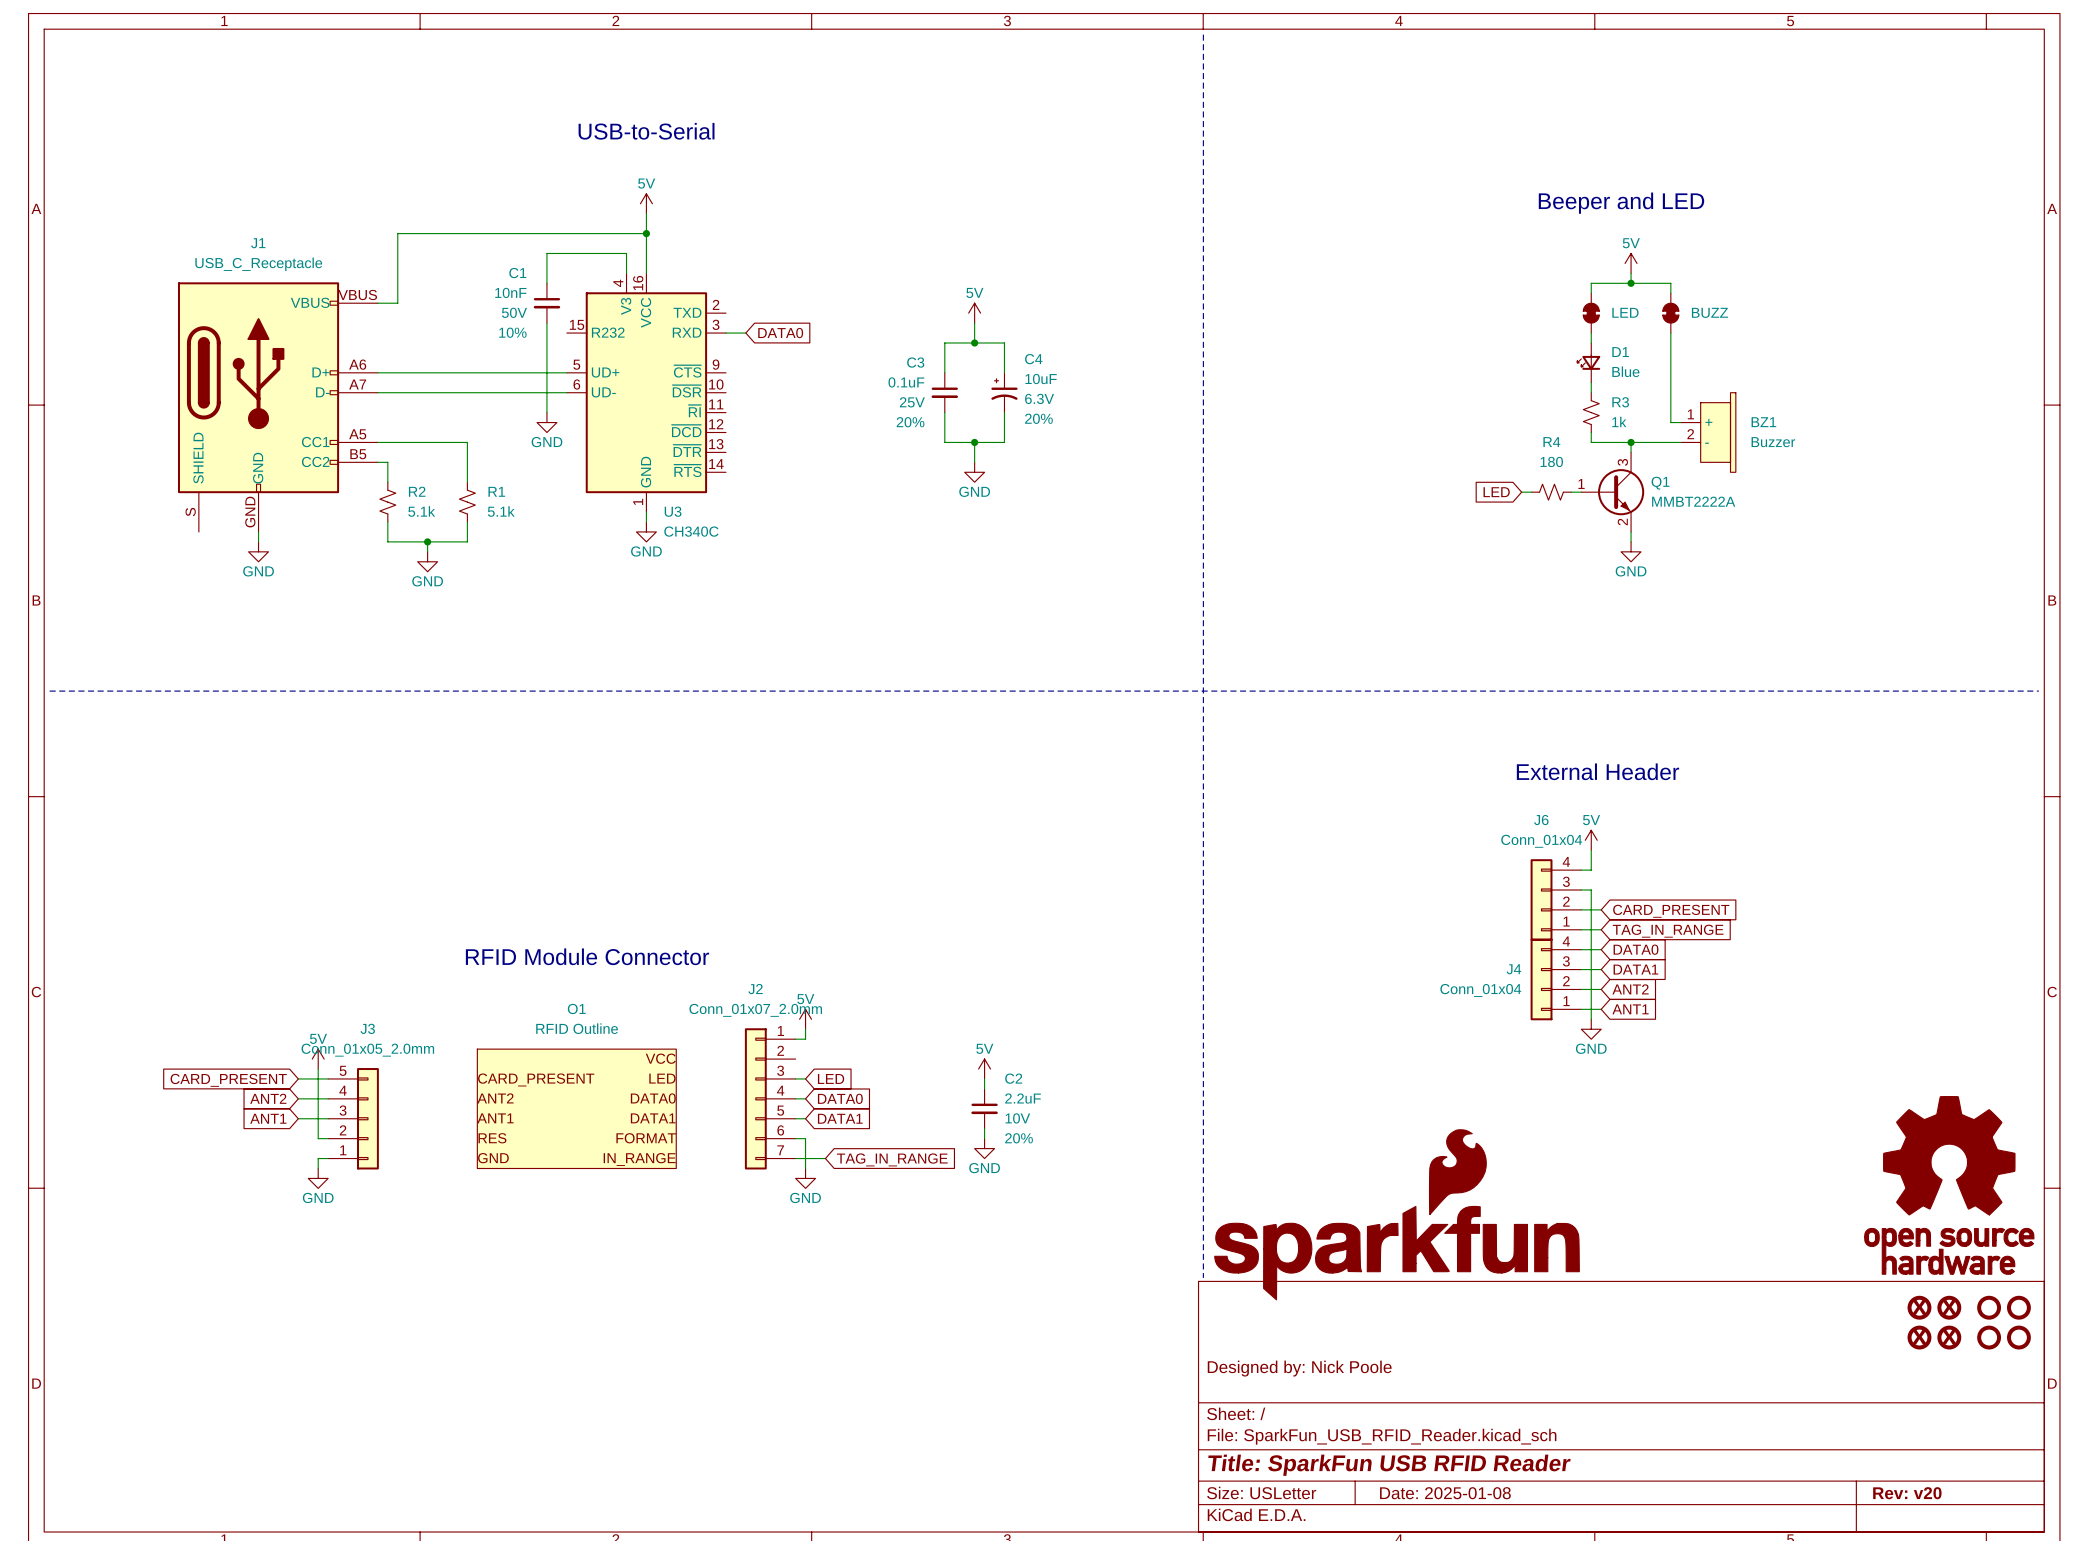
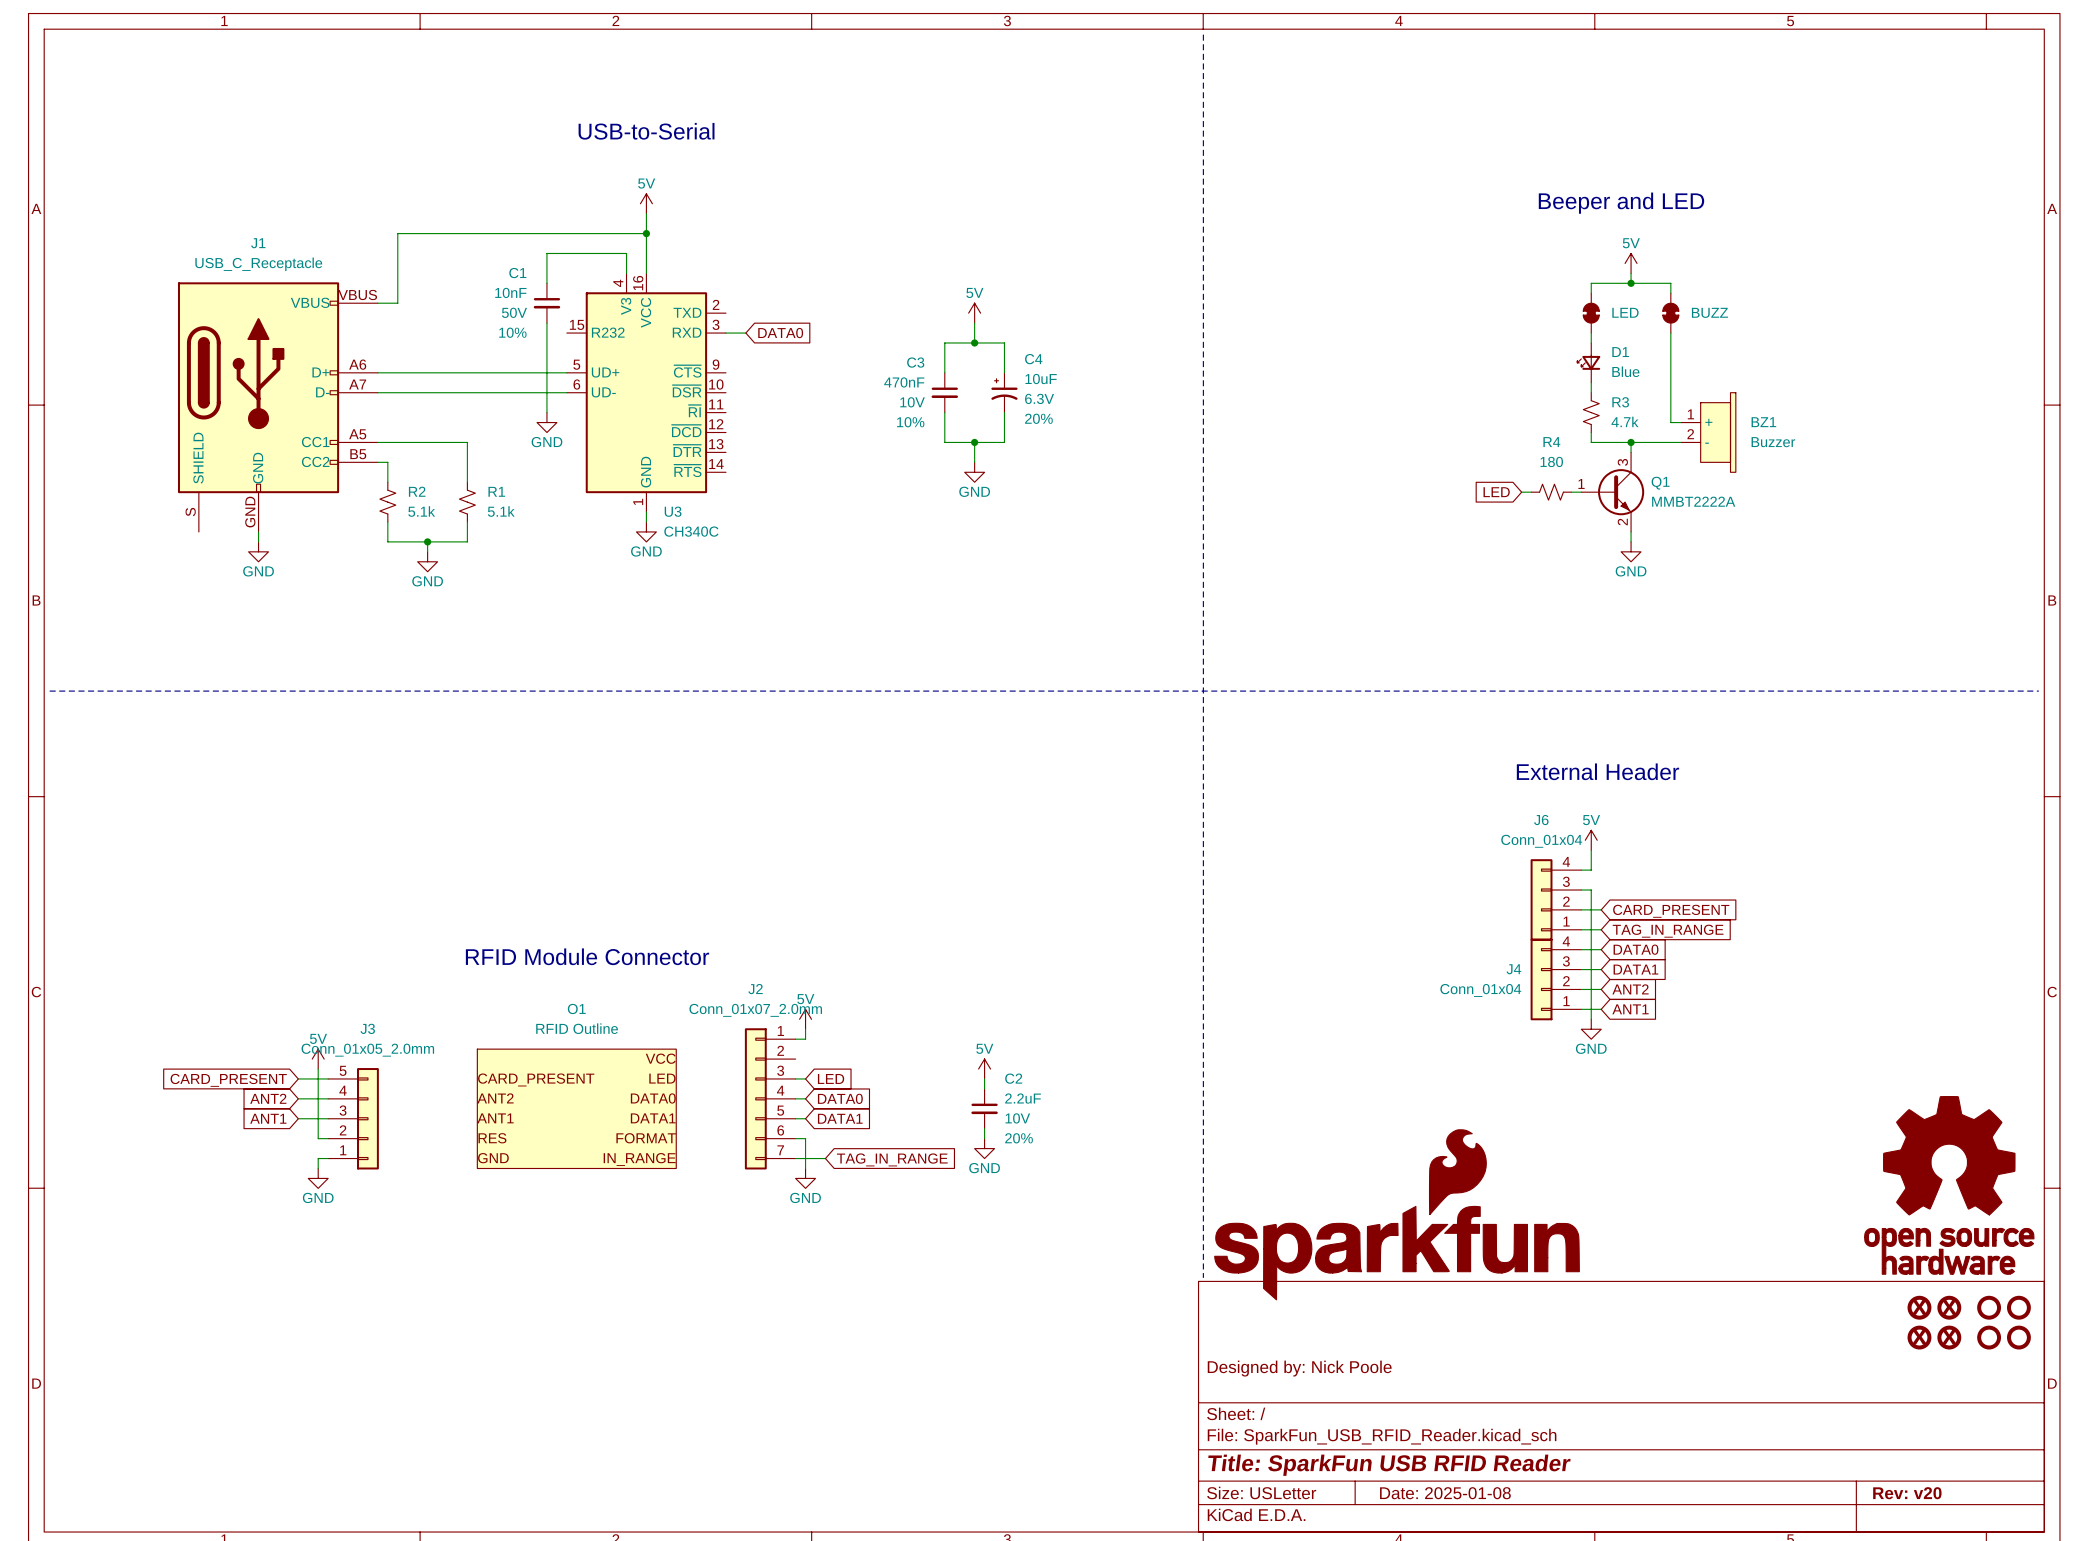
C3 value: 0.1uF (906, 382) -> 470nF (904, 382)
C3 text: 25V (912, 402) -> 10V (912, 402)
R3 value: 1k (1619, 421) -> 4.7k (1624, 421)
C3 text: 20% (910, 422) -> 10% (910, 422)

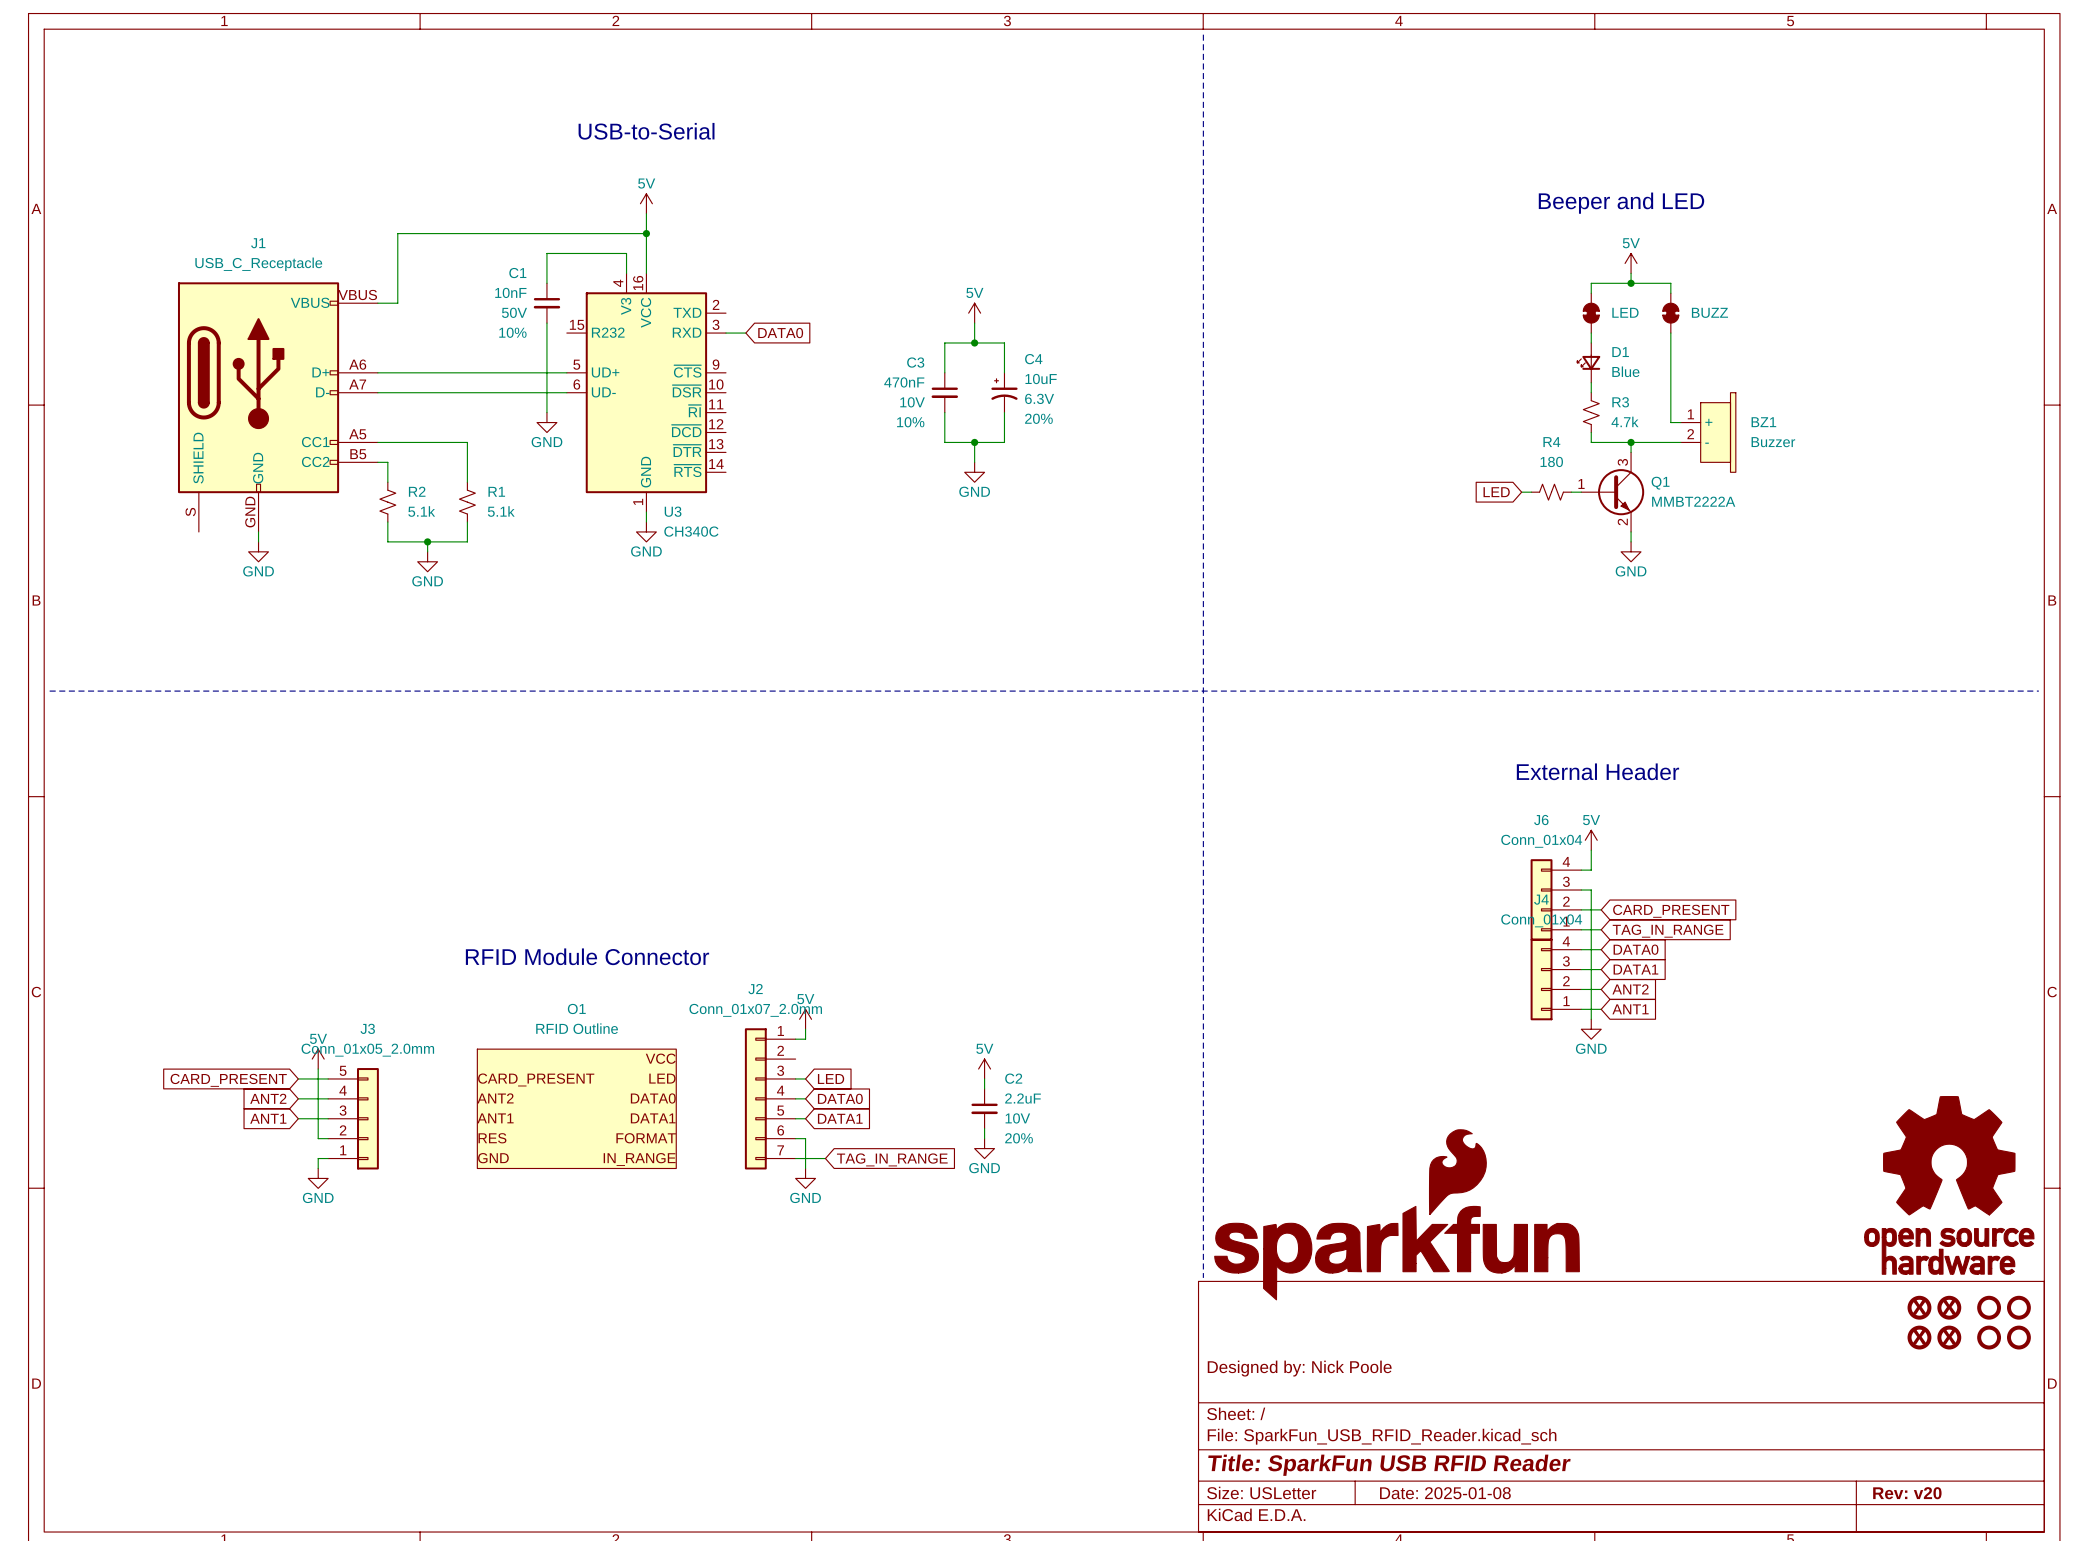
J4 name position: J4 (1513, 969) -> J4 (1541, 899)
J4 value position: Conn_01x04 (1480, 990) -> Conn_01x04 (1541, 920)

